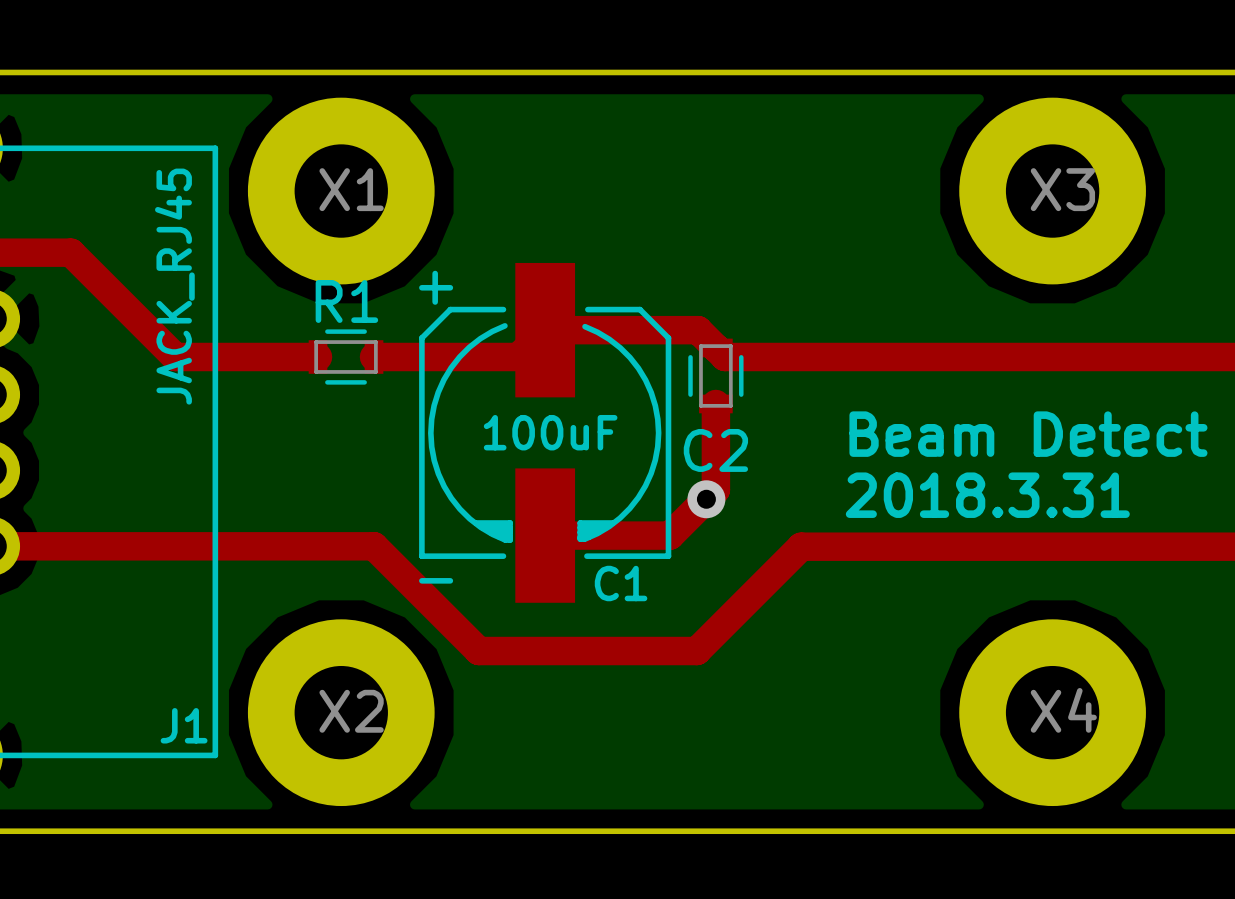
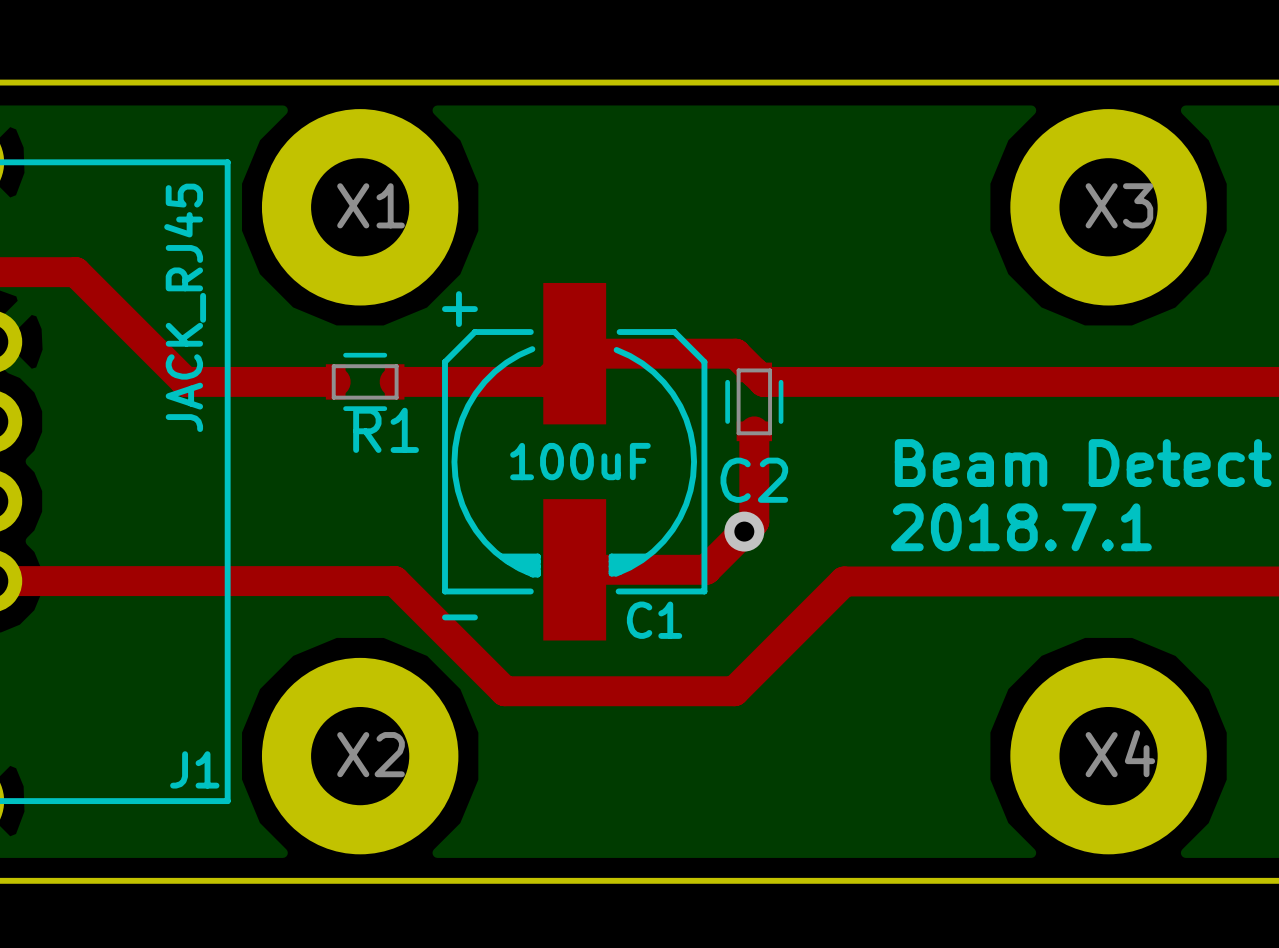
R1 name position: R1 (346, 301) -> R1 (386, 430)
text: 2018.3.31 (987, 495) -> 2018.7.1 (1021, 527)

